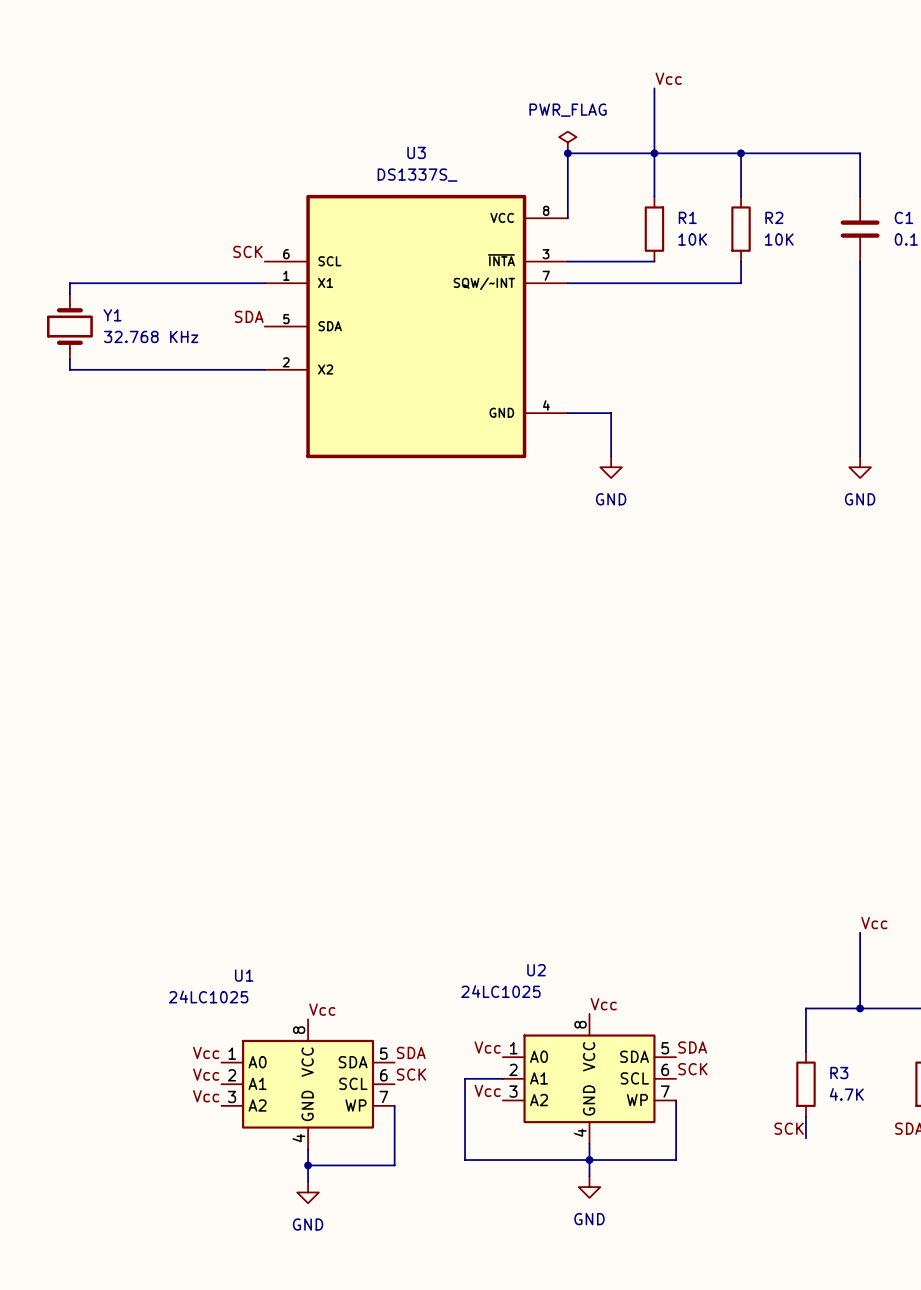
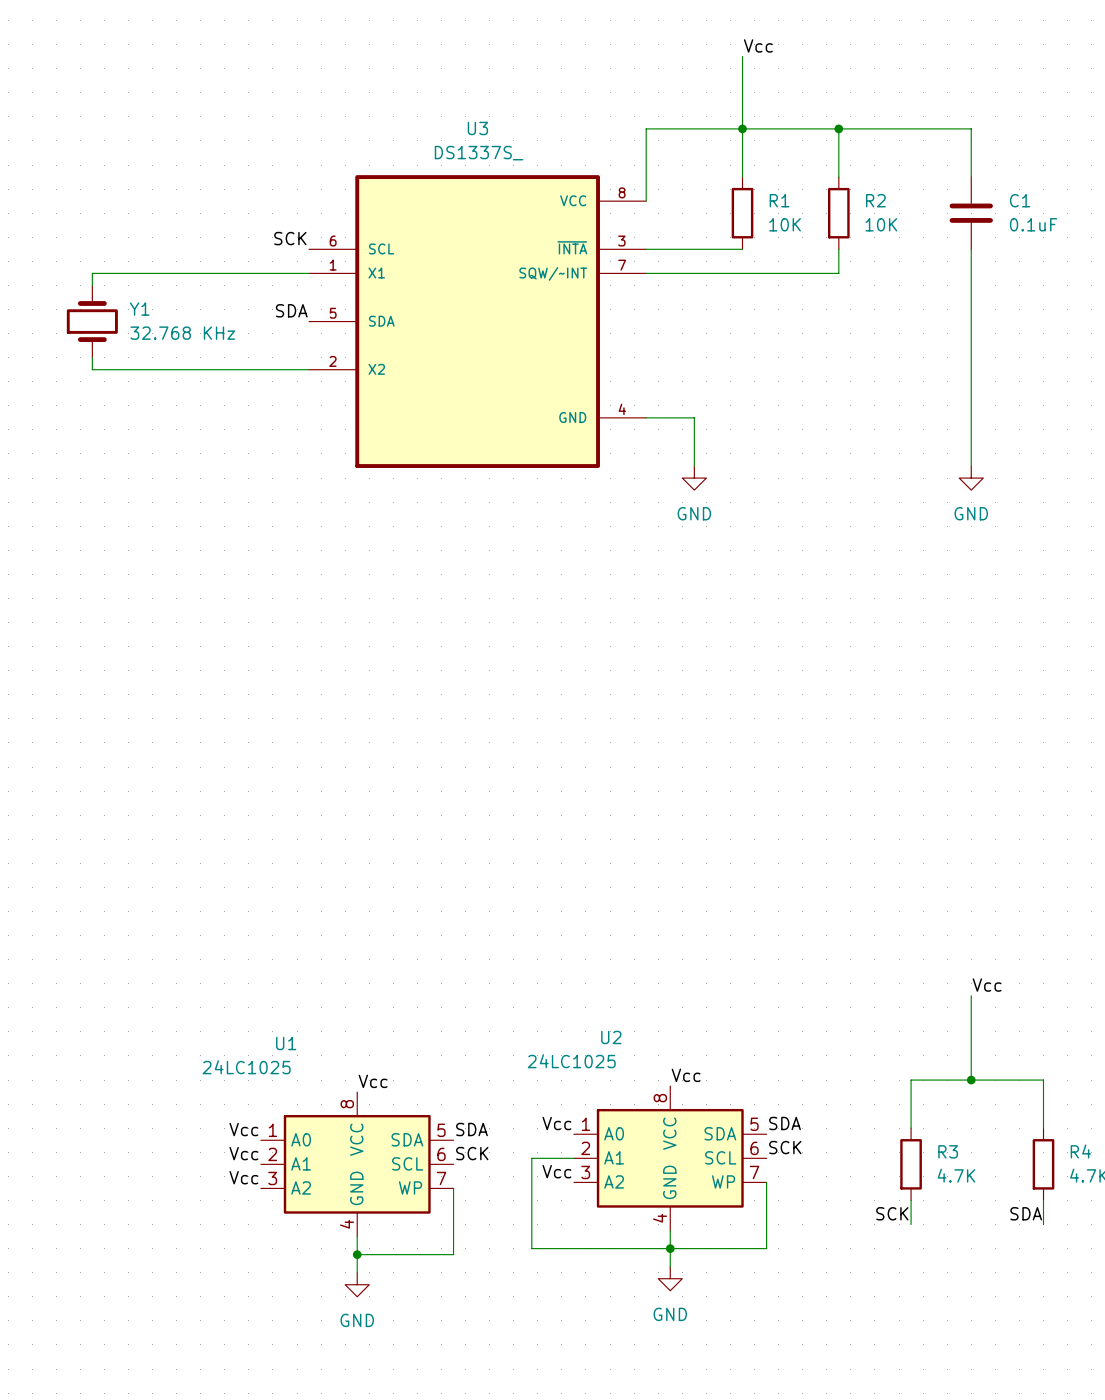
power symbol: PWR_FLAG (567, 142) -> none
junction: (567, 153) -> none

